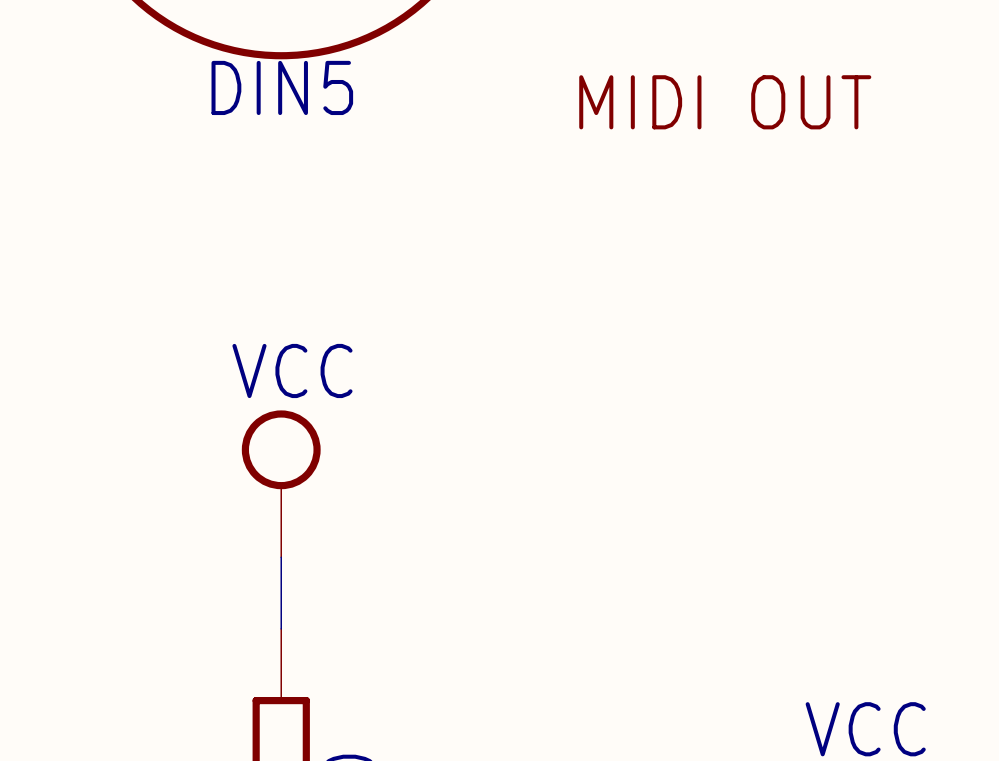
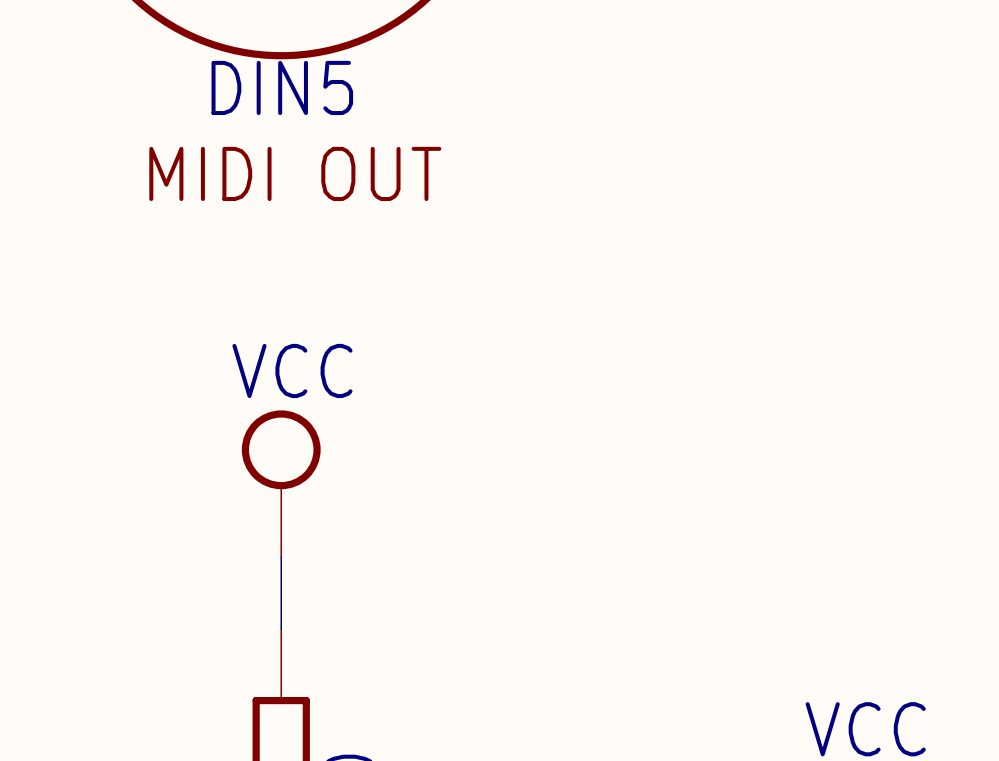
text position: MIDI OUT (725, 102) -> MIDI OUT (295, 173)

